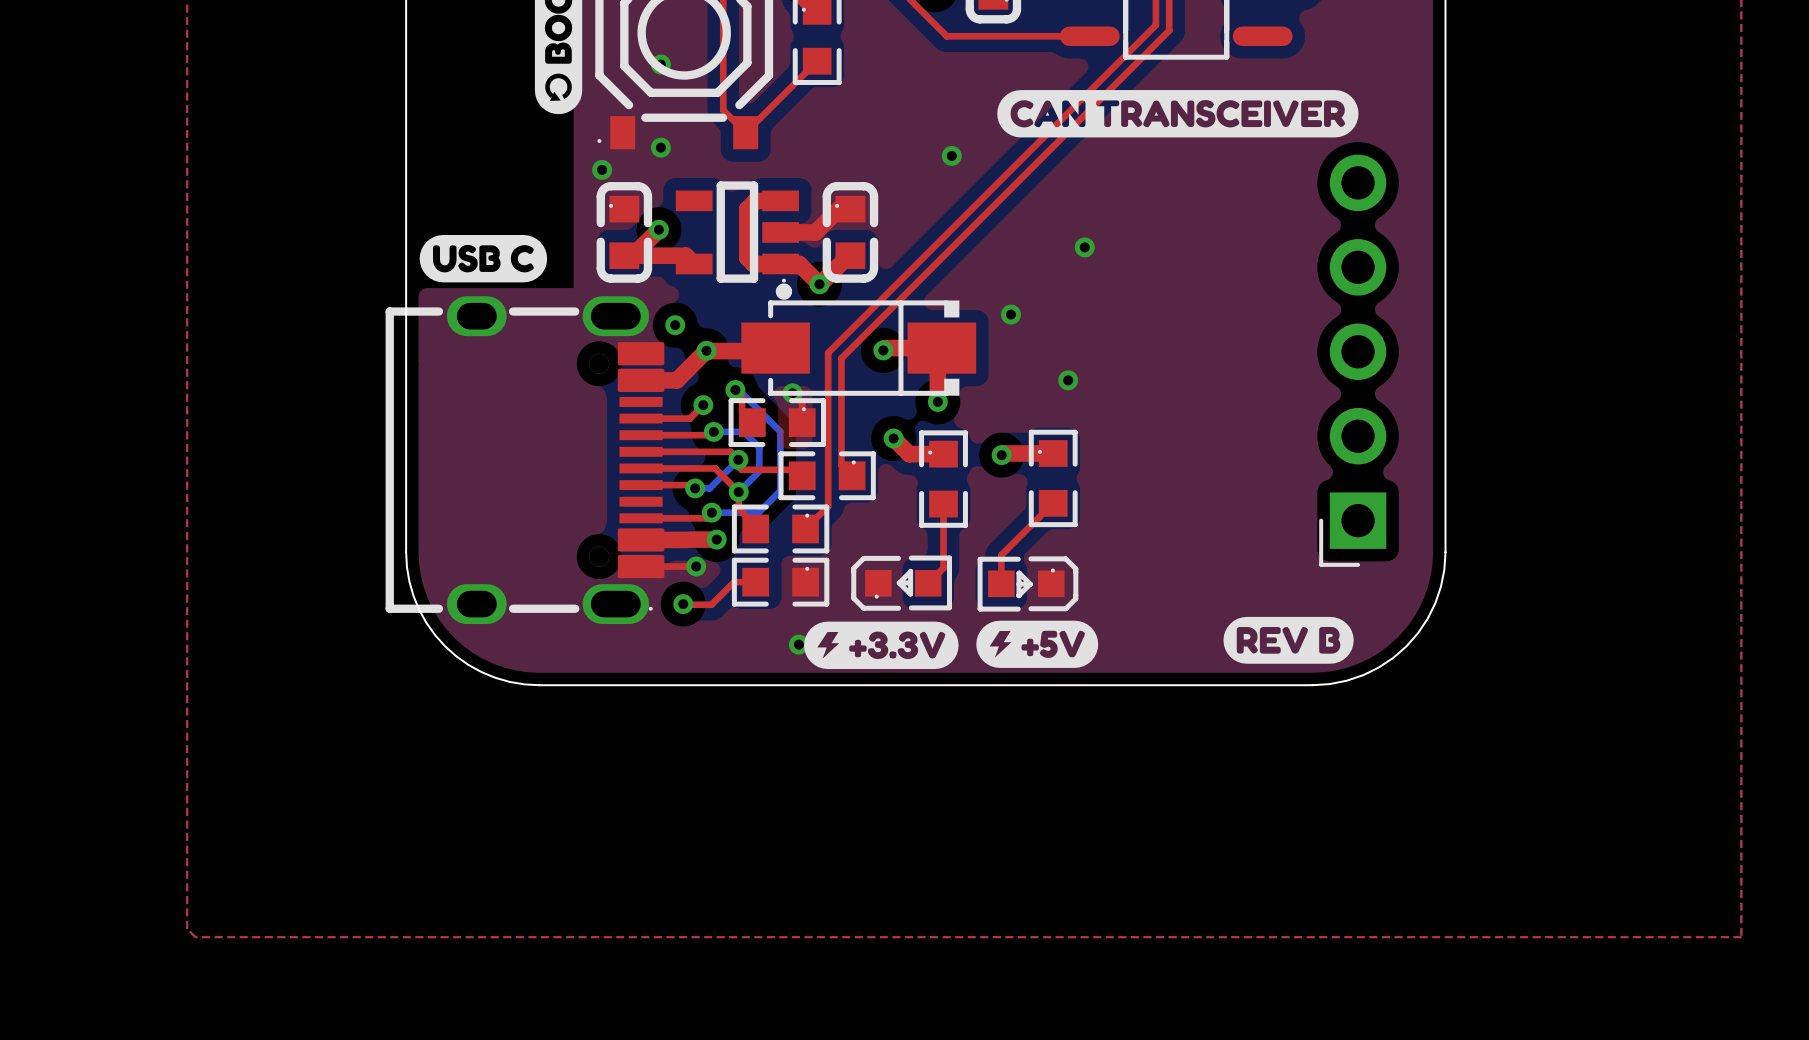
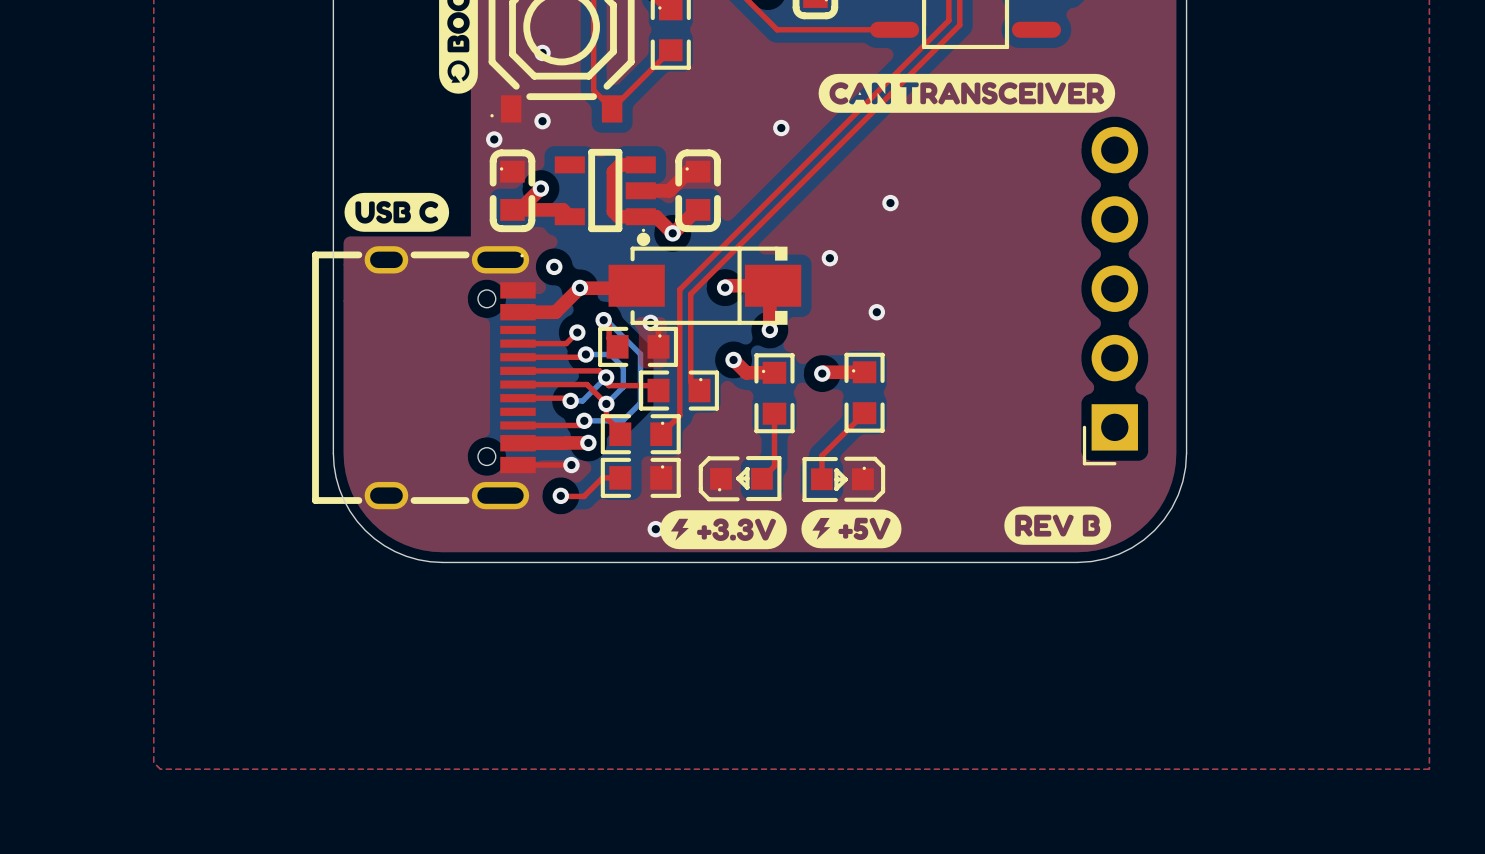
part footprint: [385, 296, 665, 625] -> [312, 246, 536, 510]

